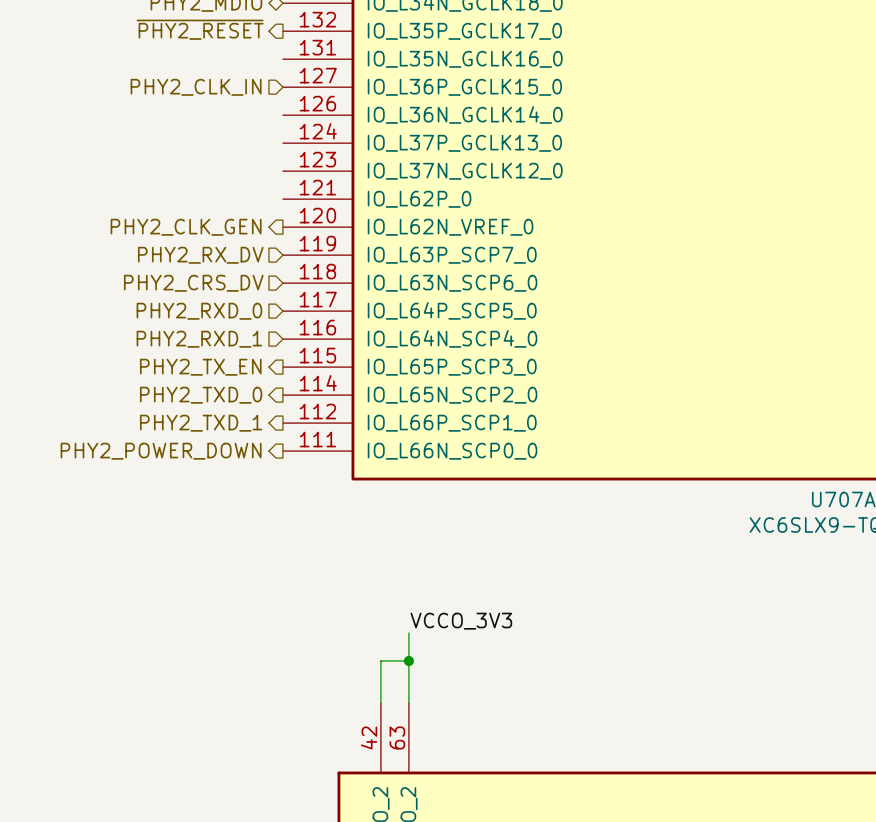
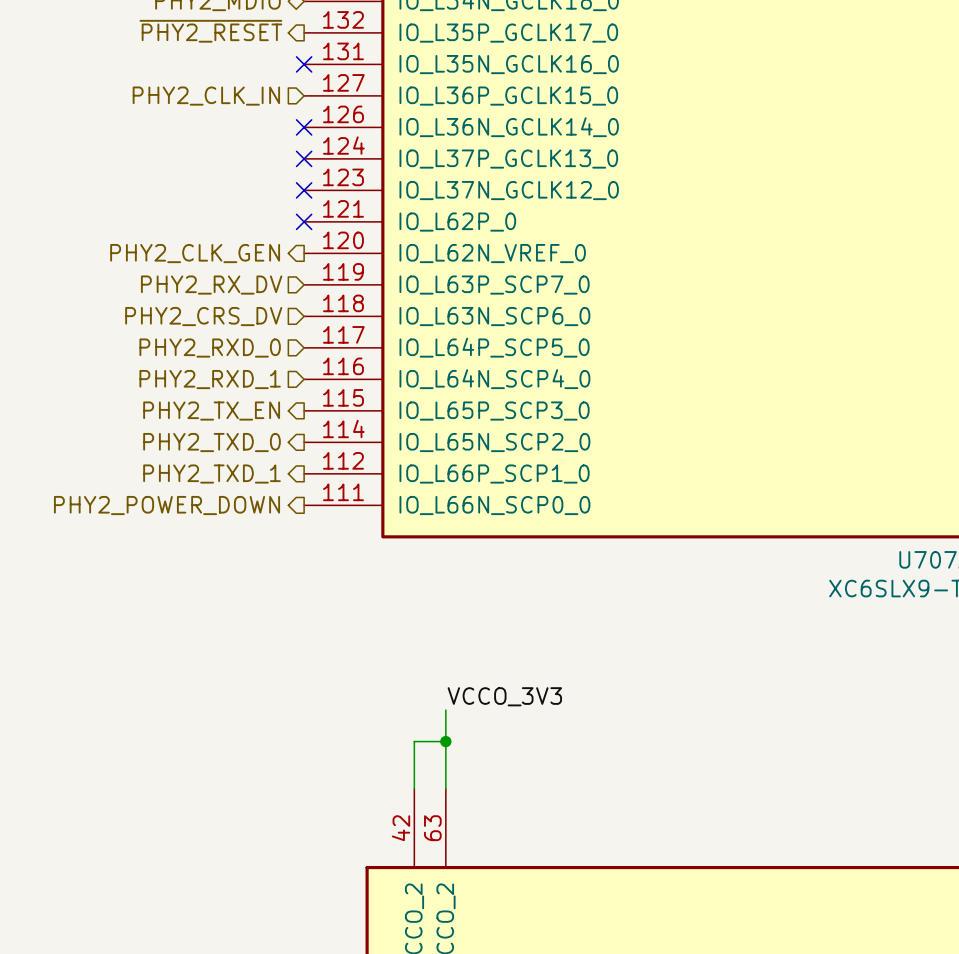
no-connect mark: none -> (304, 64)
no-connect mark: none -> (304, 127)
no-connect mark: none -> (304, 158)
no-connect mark: none -> (304, 190)
no-connect mark: none -> (304, 221)

